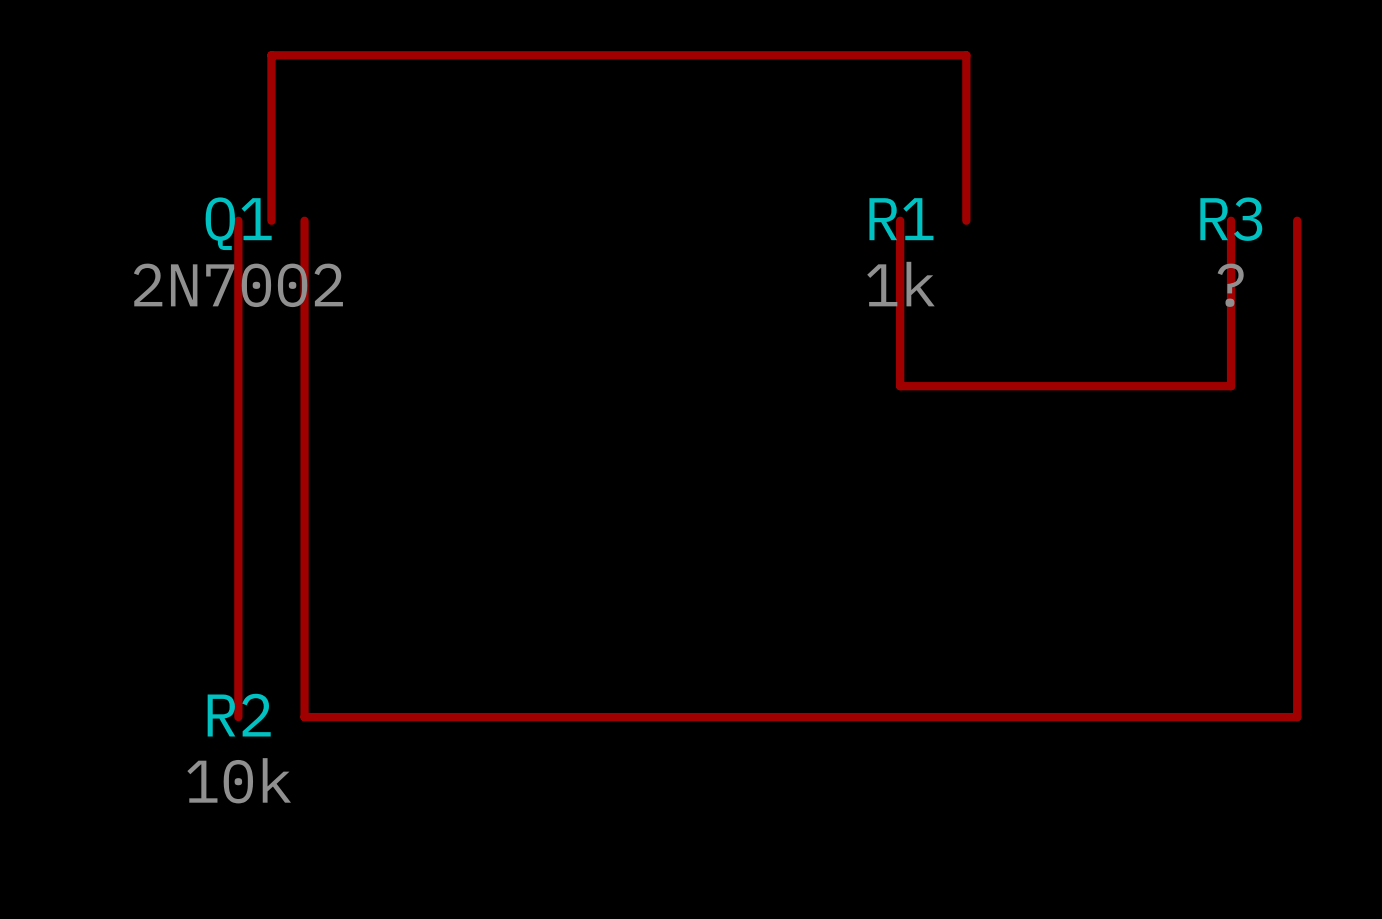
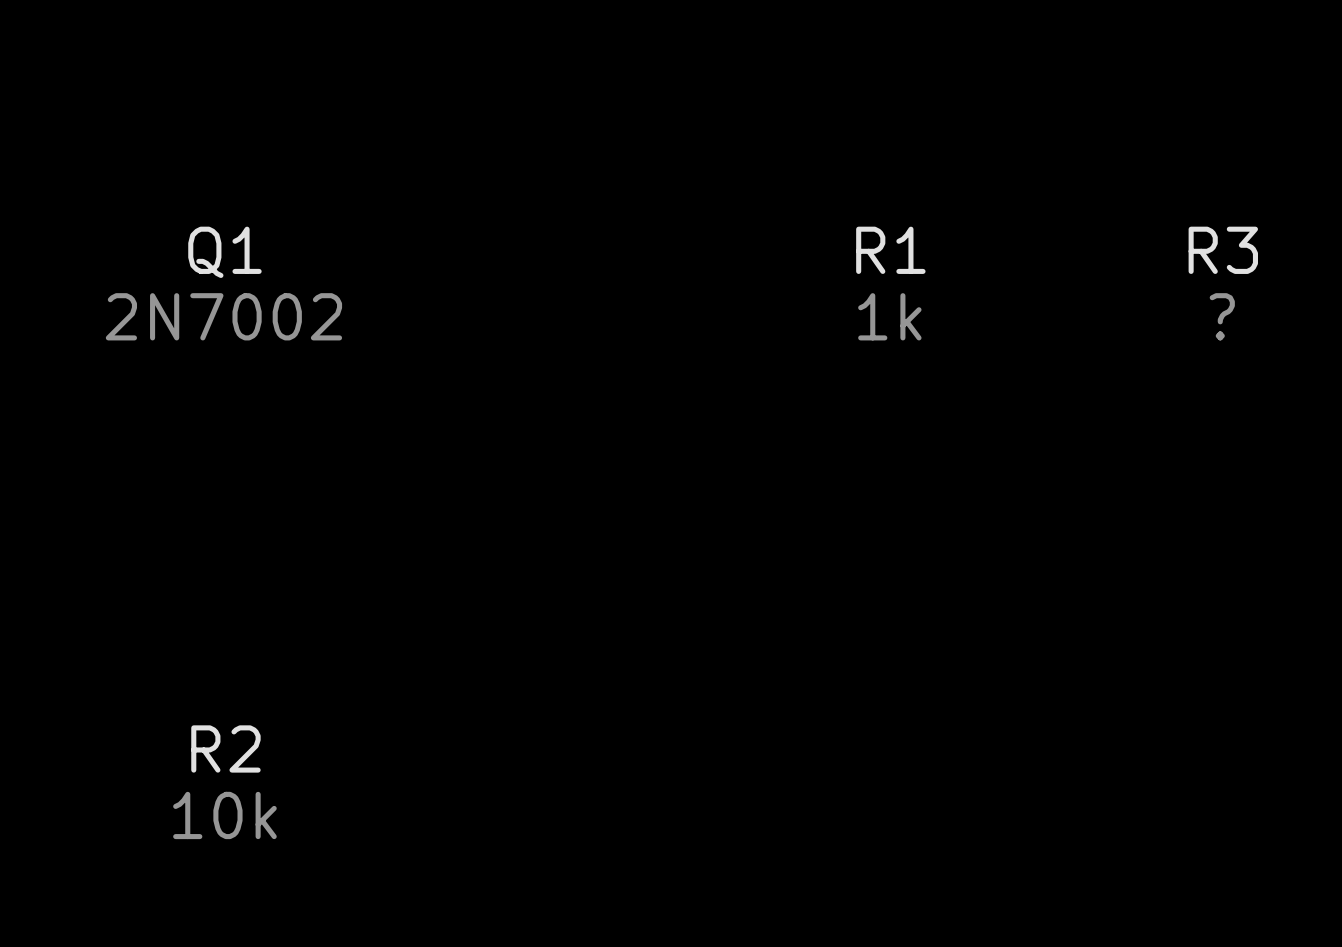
top track: (238, 220) (238, 717) -> none
top track: (271, 220) (271, 55) (966, 55) (966, 220) -> none
top track: (304, 220) (304, 717) (1297, 717) (1297, 220) -> none
top track: (900, 220) (900, 386) (1231, 386) (1231, 220) -> none

